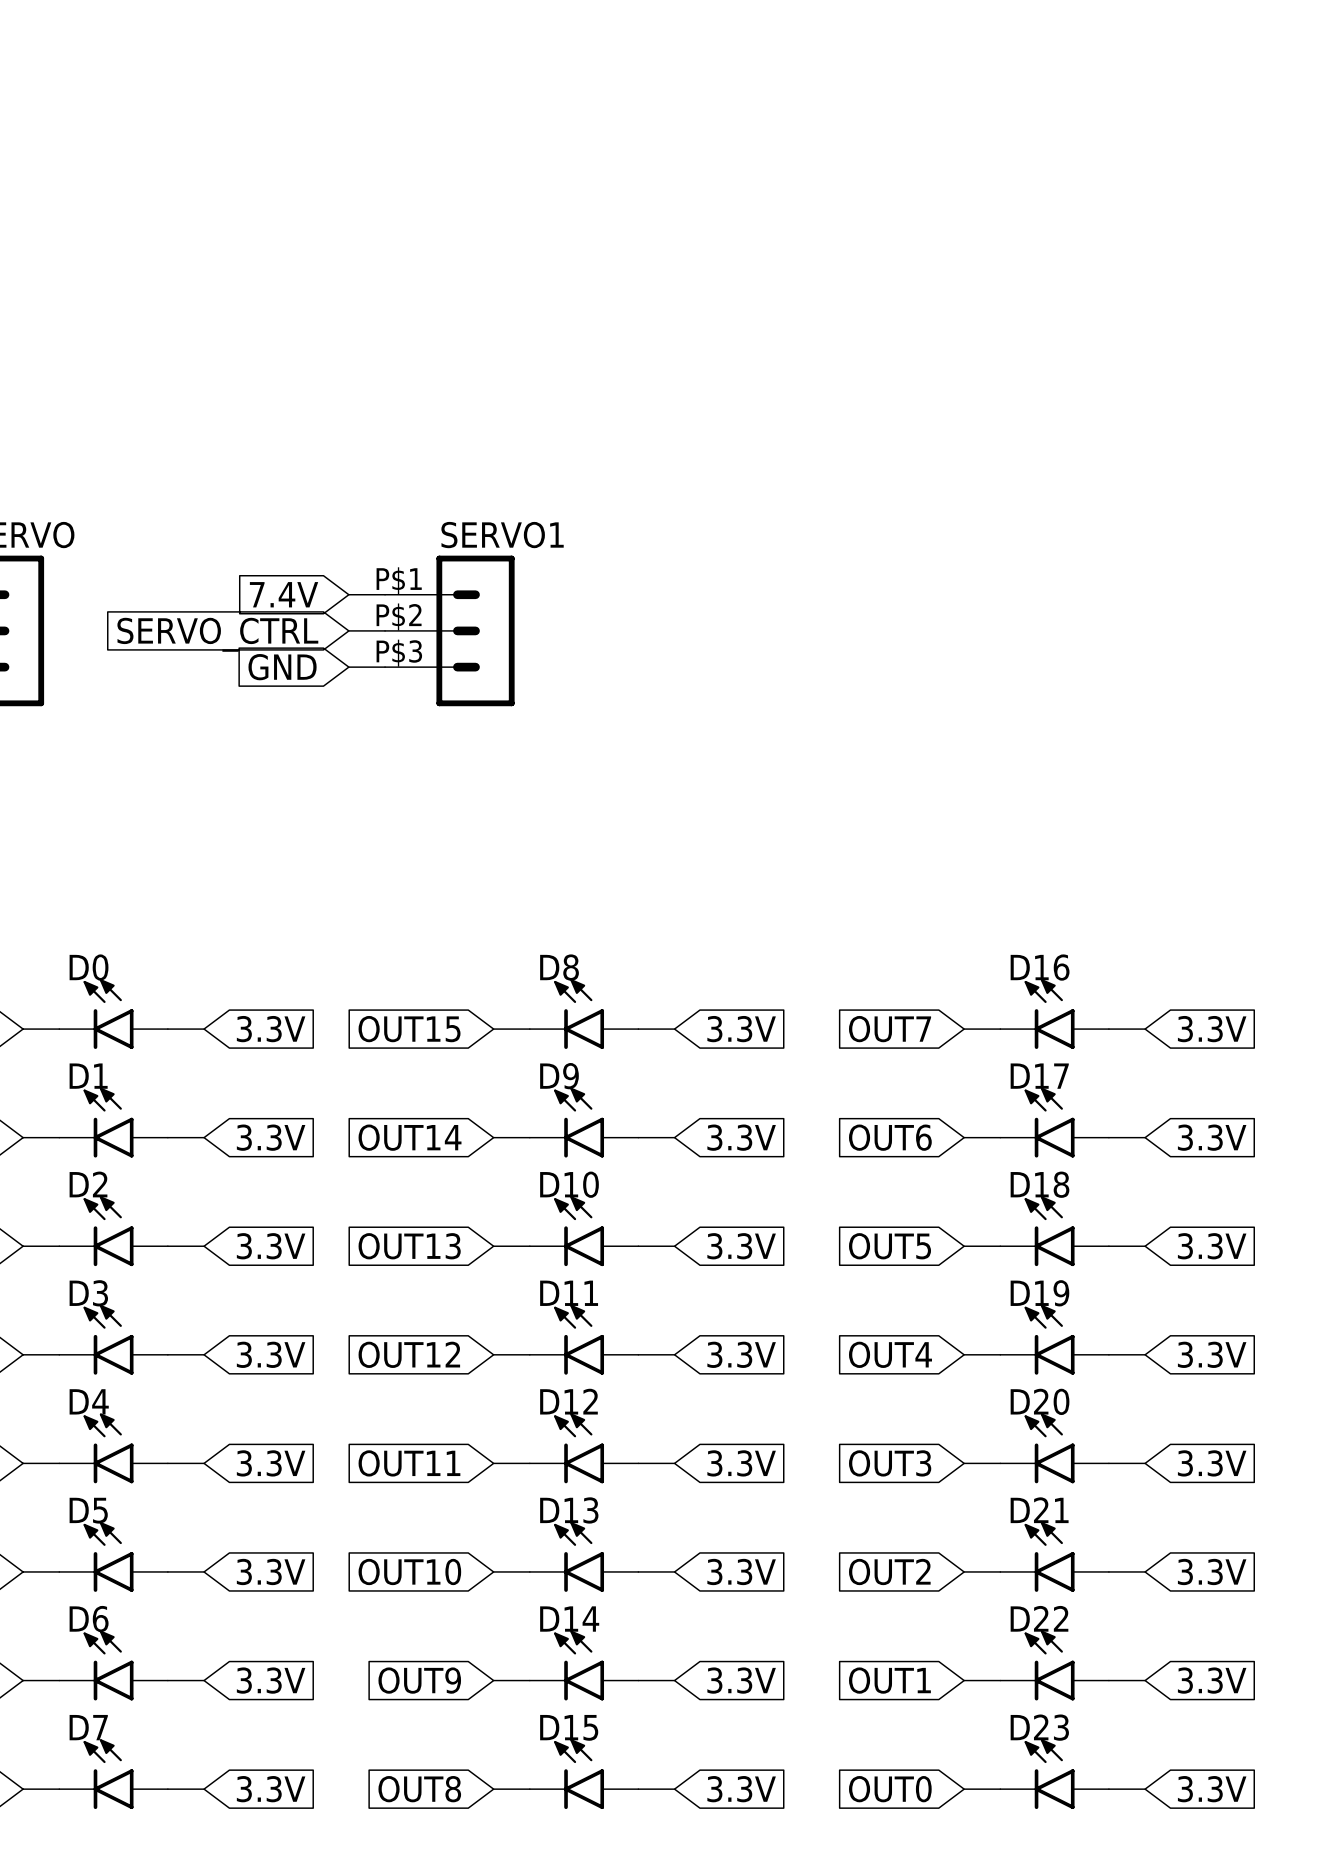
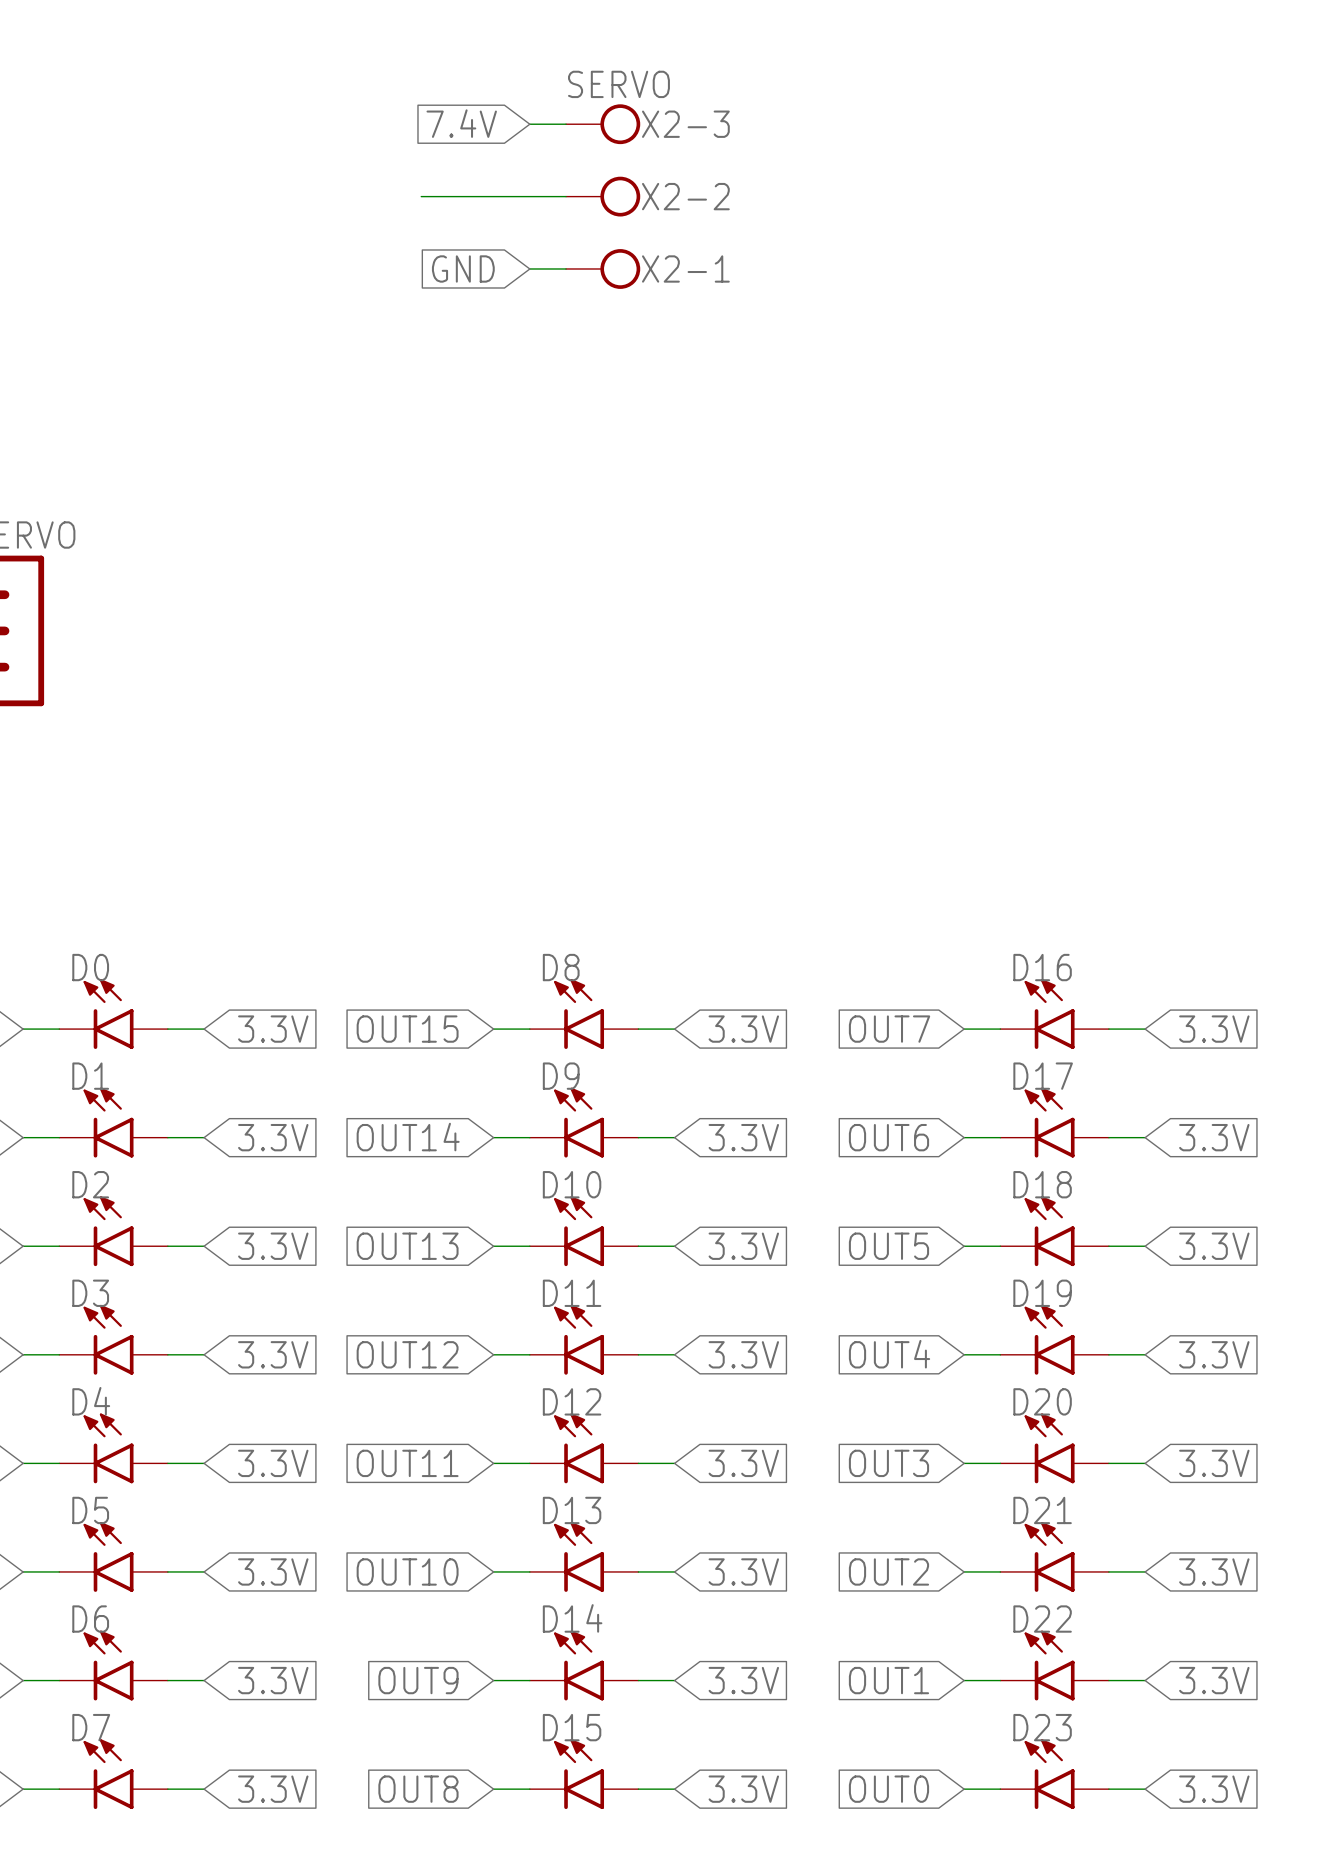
global label: none -> 7.4V (461, 123)
wire: none -> (529, 124) (566, 124)
X2-3: none -> SERVO (603, 124)
wire: none -> (421, 196) (566, 196)
X2-2: none -> (603, 196)
wire: none -> (529, 268) (566, 268)
X2-1: none -> (603, 268)
global label: none -> GND (463, 268)
global label: 7.4V (284, 594) -> none
wire: (348, 594) (385, 594) -> none
wire: (348, 630) (385, 630) -> none
SERVO1: (449, 630) -> none
global label: SERVO_CTRL (217, 634) -> none
global label: GND (282, 667) -> none
wire: (348, 667) (385, 667) -> none

